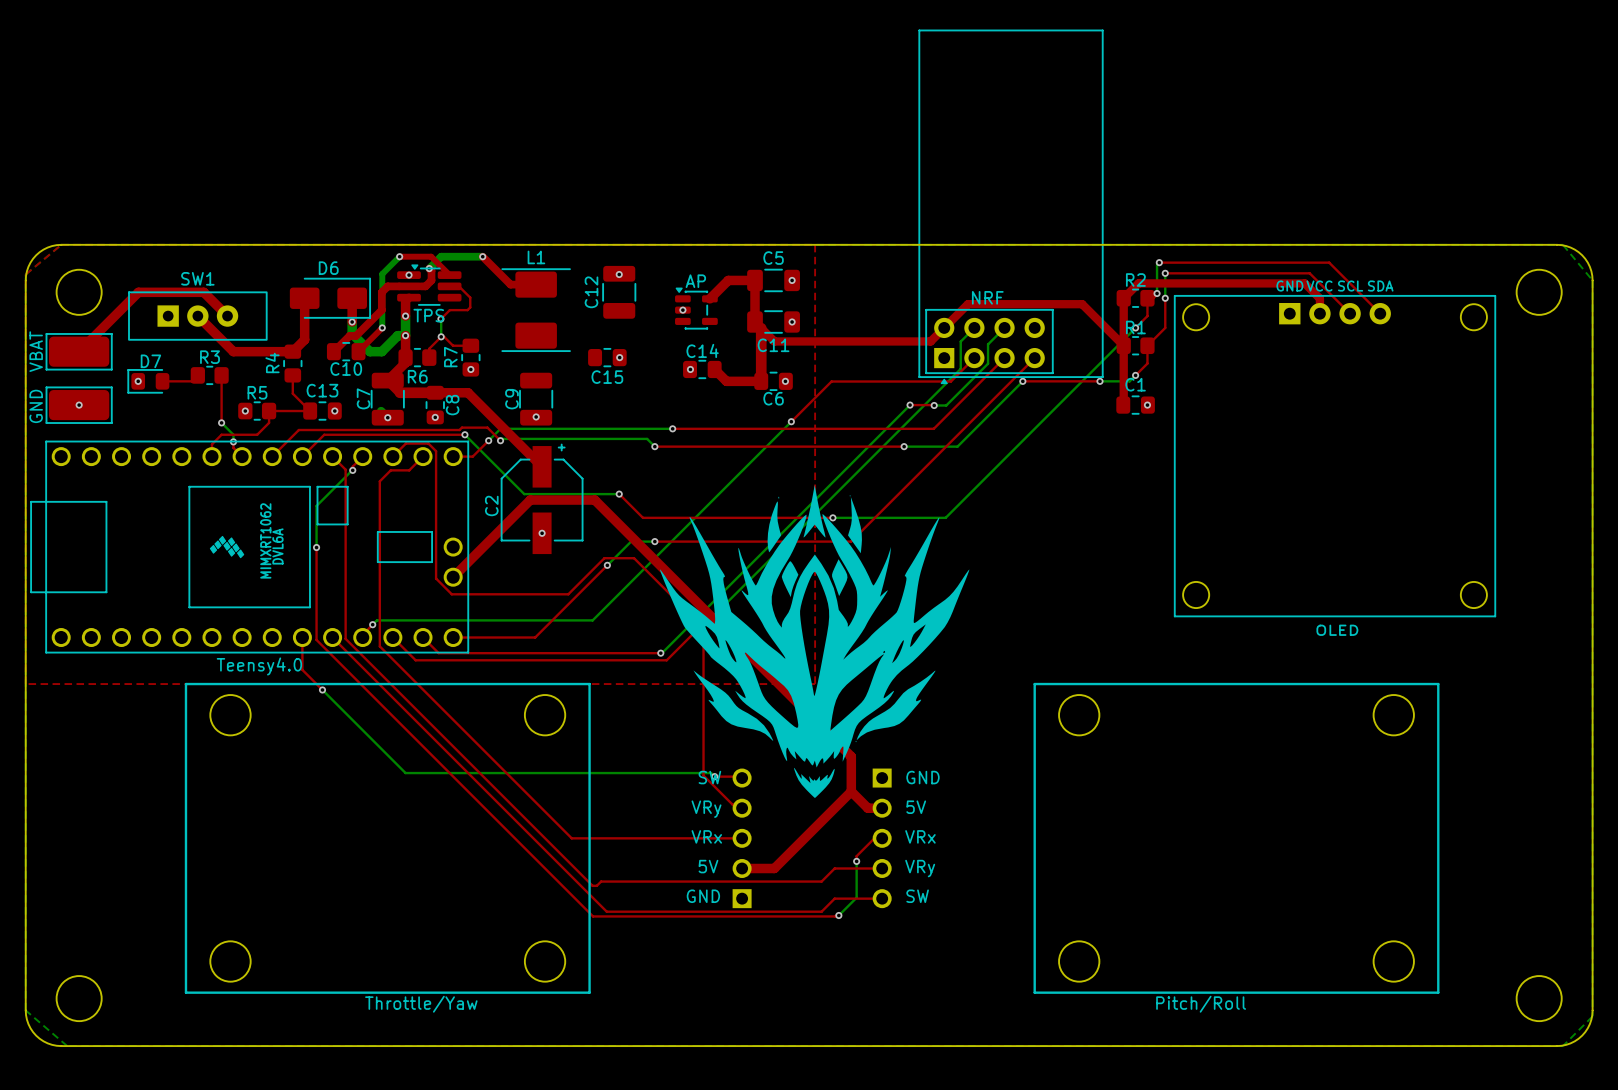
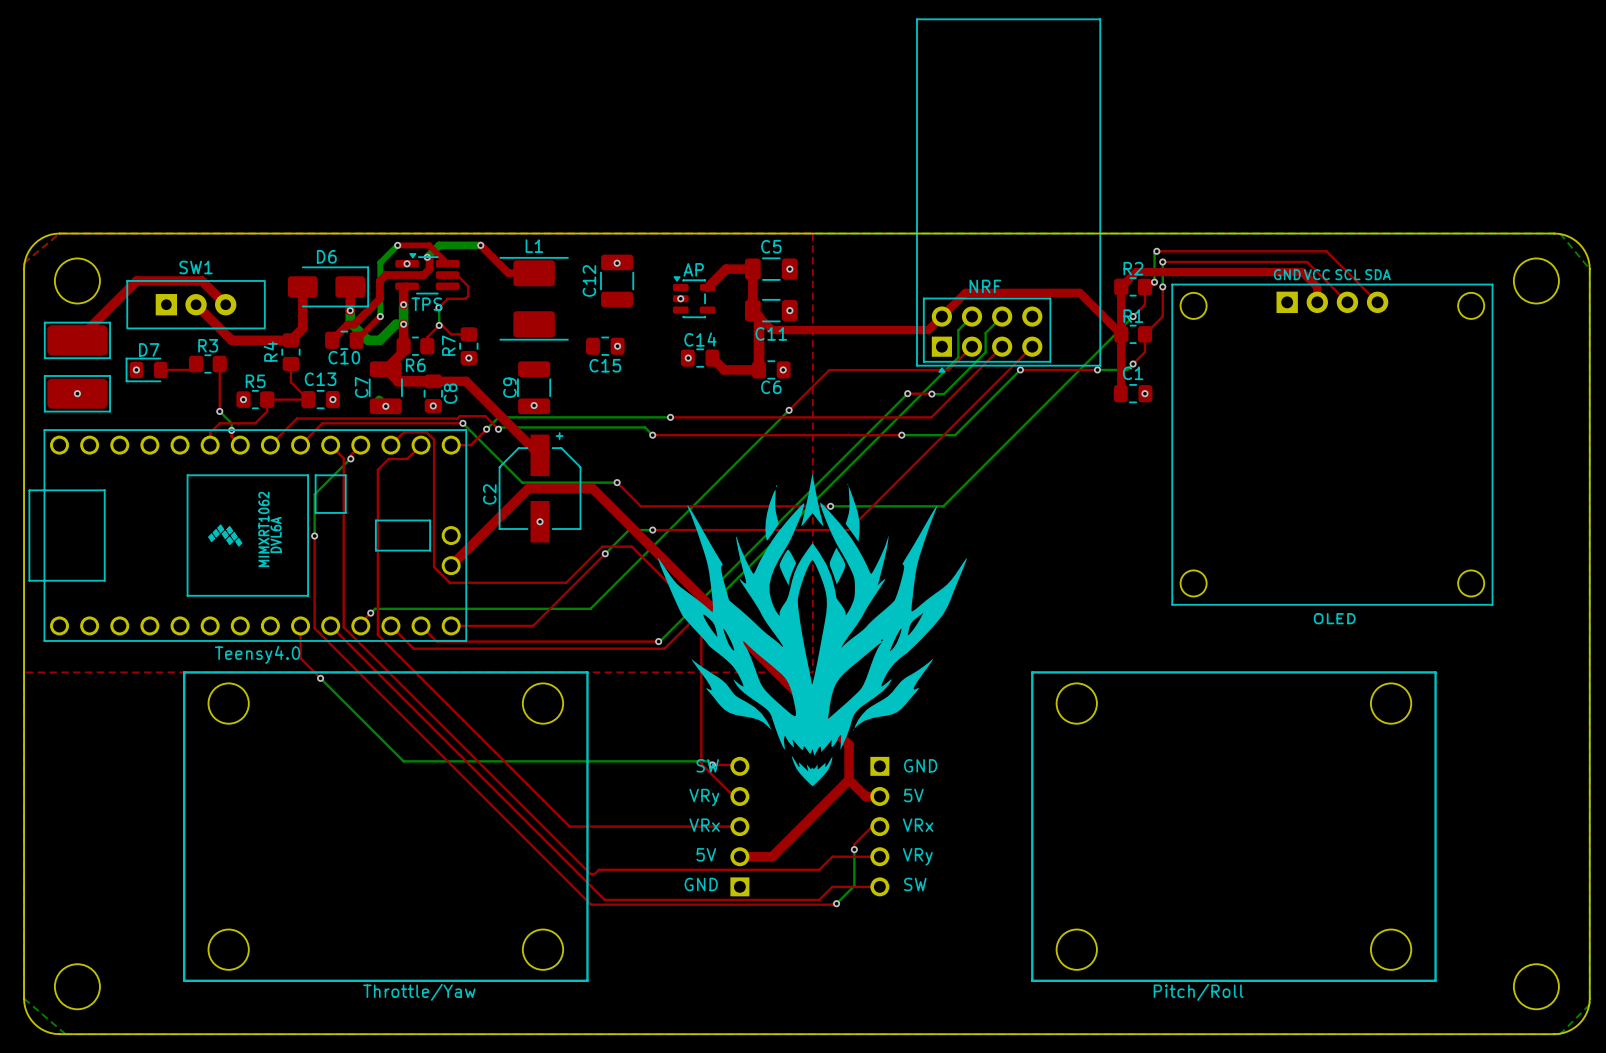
text: VBAT (36, 351) -> none
text: GND (36, 406) -> none

